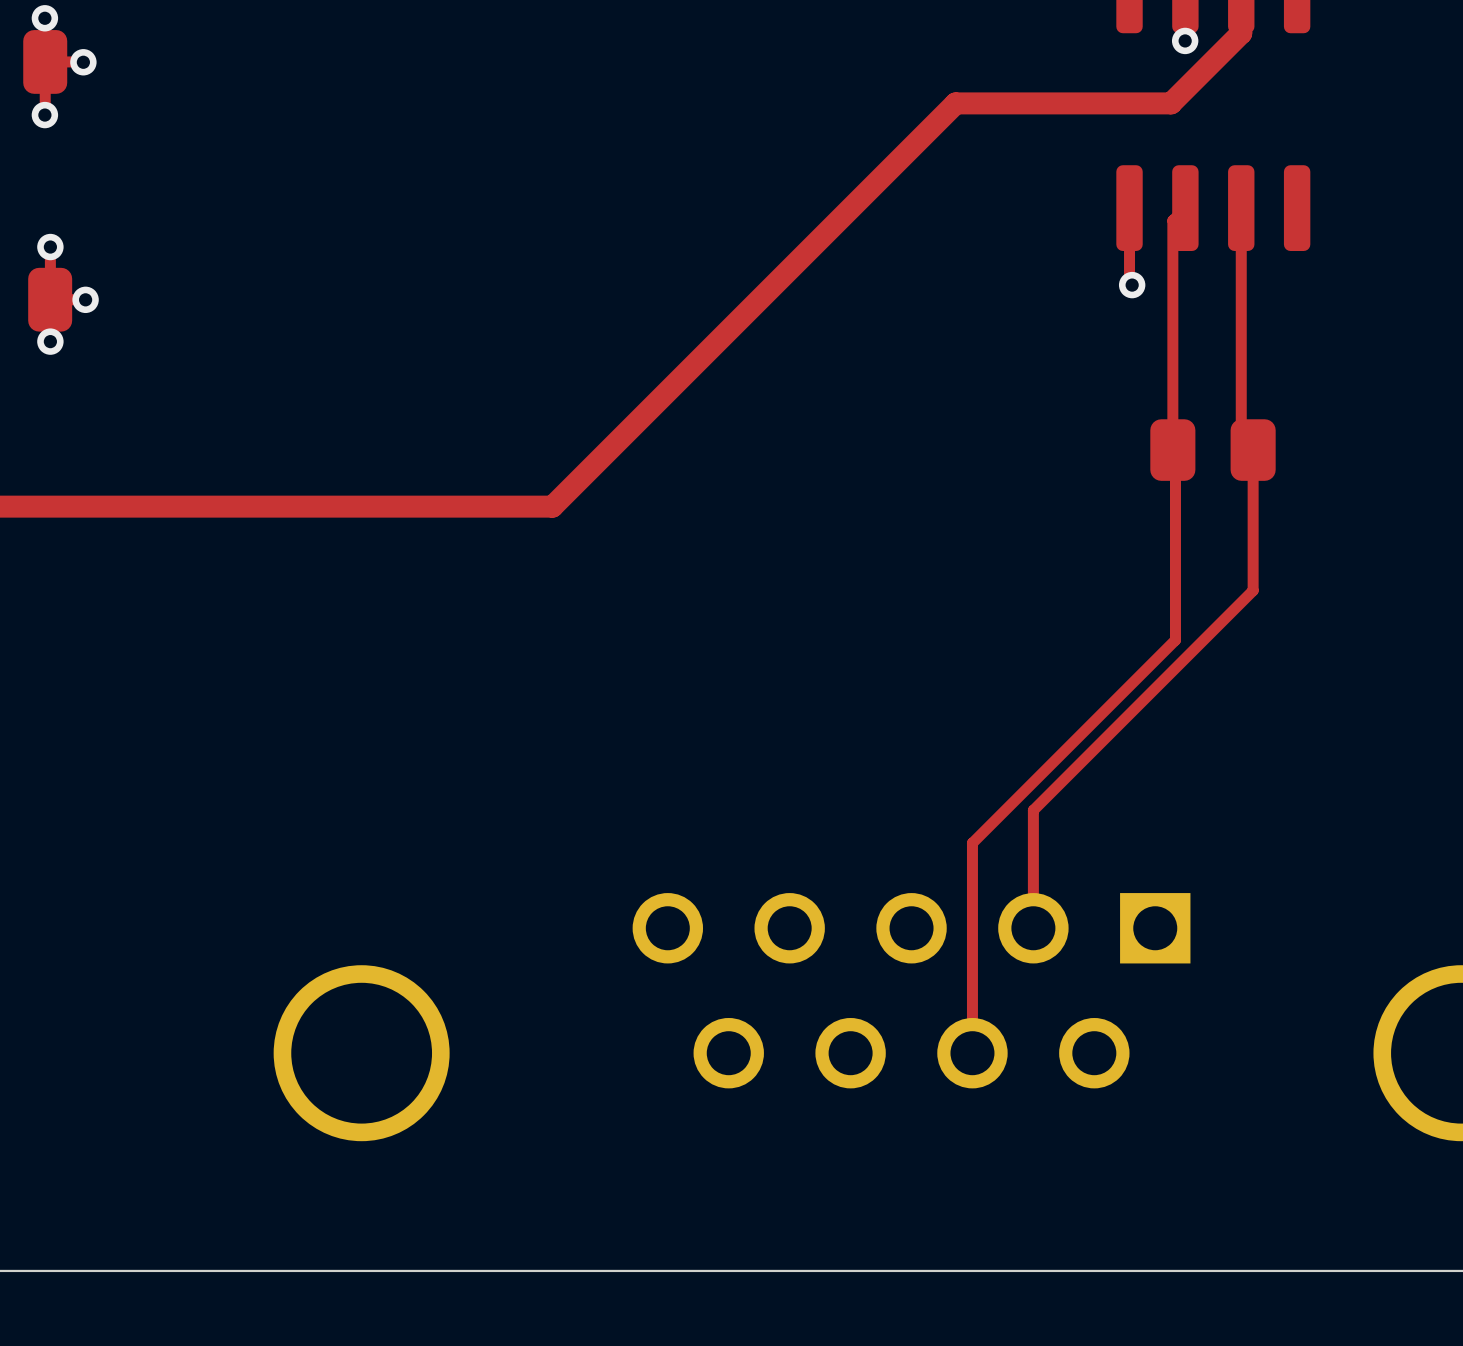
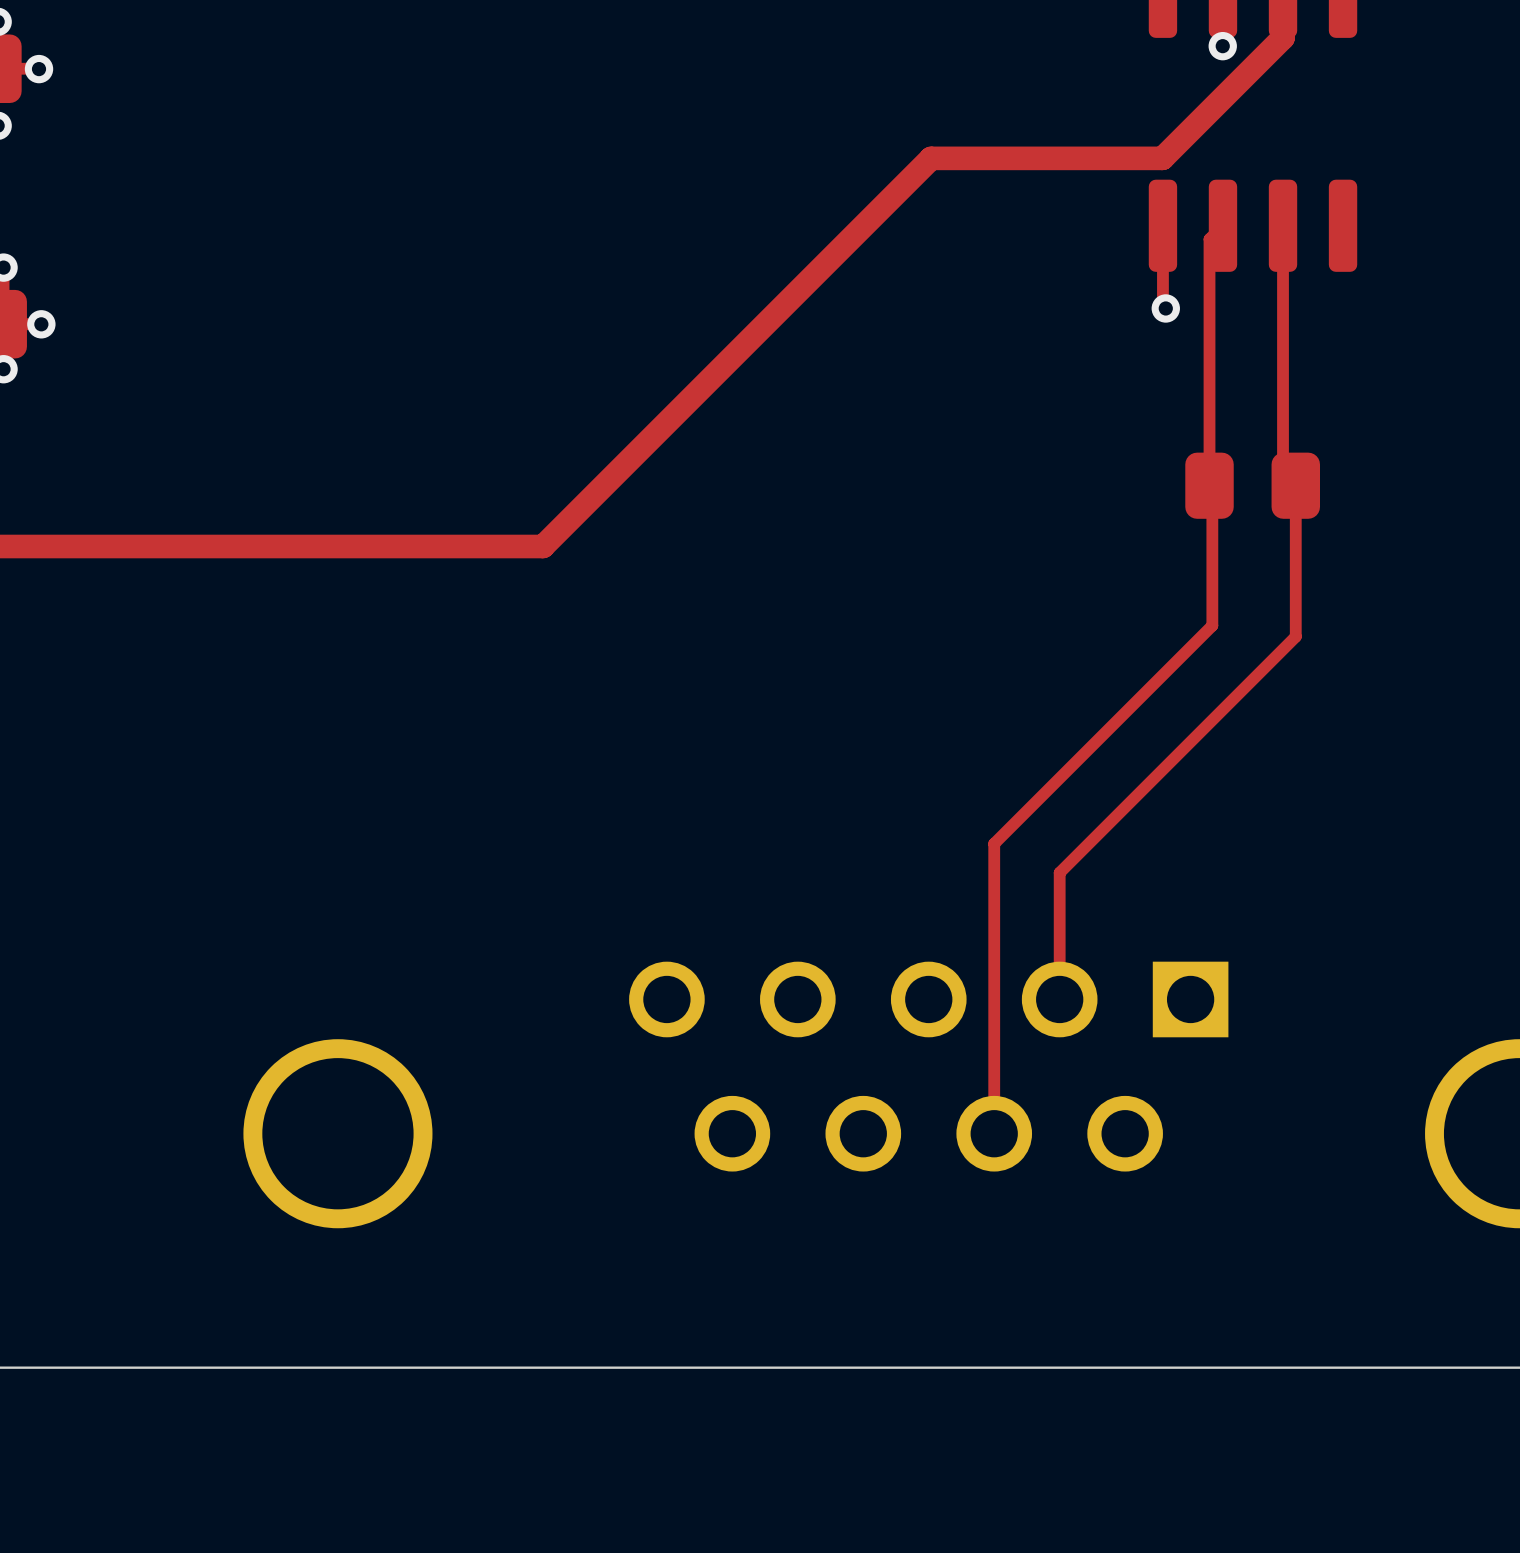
top track: (1171, 103) (955, 103) (913, 145) -> (1207, 113) (1162, 158) (931, 158)
top track: (1175, 580) (1175, 640) (972, 843) -> (1212, 625) (994, 843) (994, 908)

